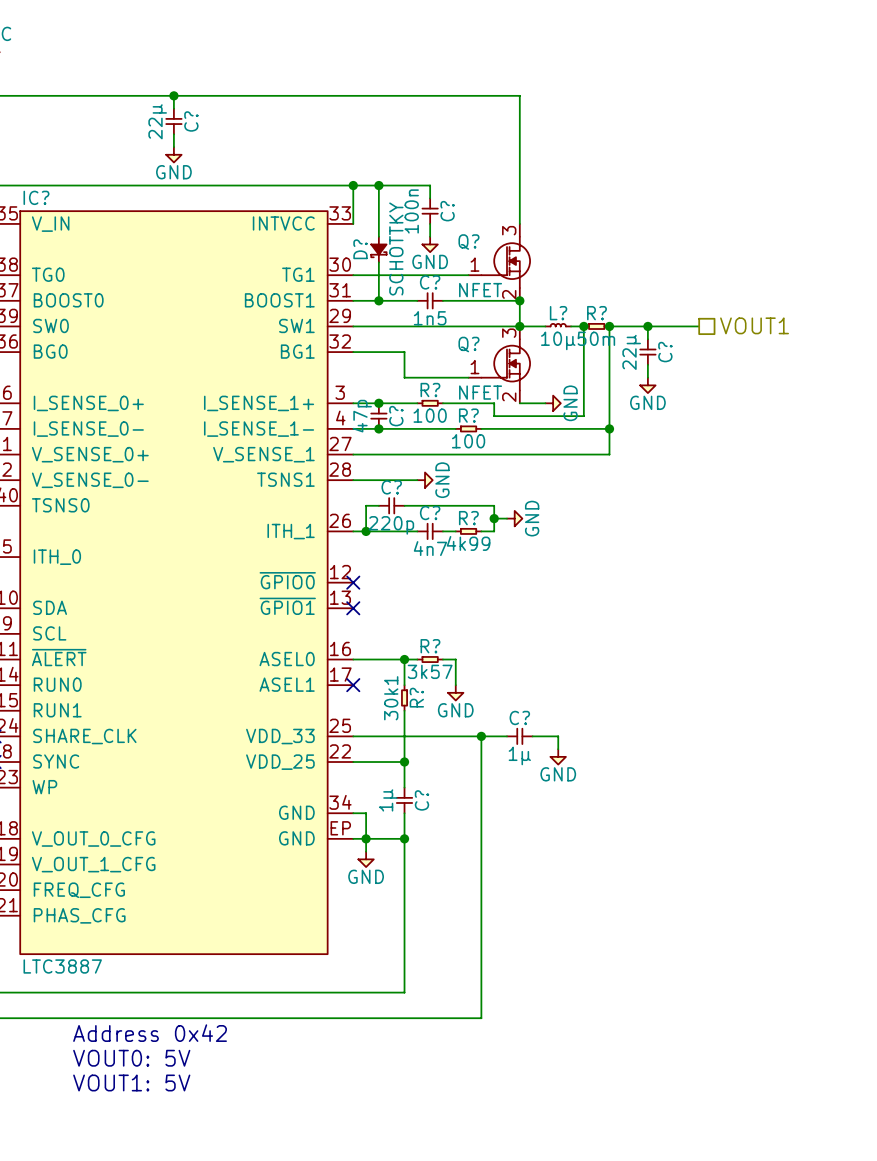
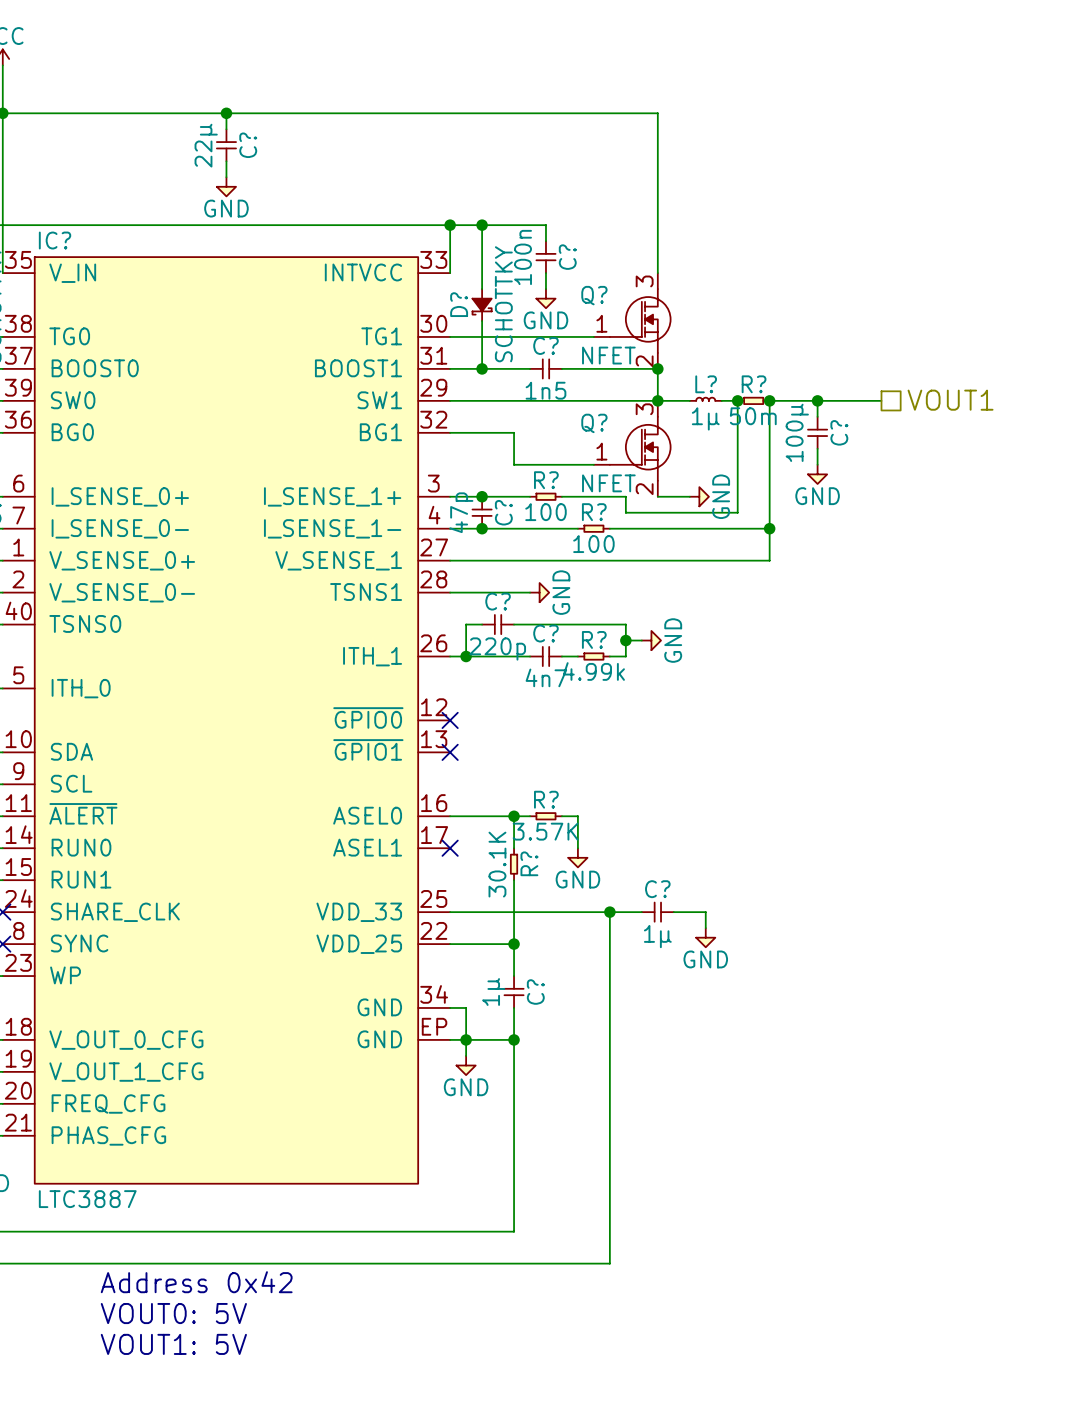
L? value: 10µ (558, 340) -> 1µ (705, 418)
C? value: 22µ (631, 352) -> 100µ (797, 432)
R? value: 4k99 (468, 543) -> 4.99k (593, 671)
R? value: 3k57 (430, 671) -> 3.57K (545, 831)
R? value: 30k1 (391, 698) -> 30.1K (497, 864)

